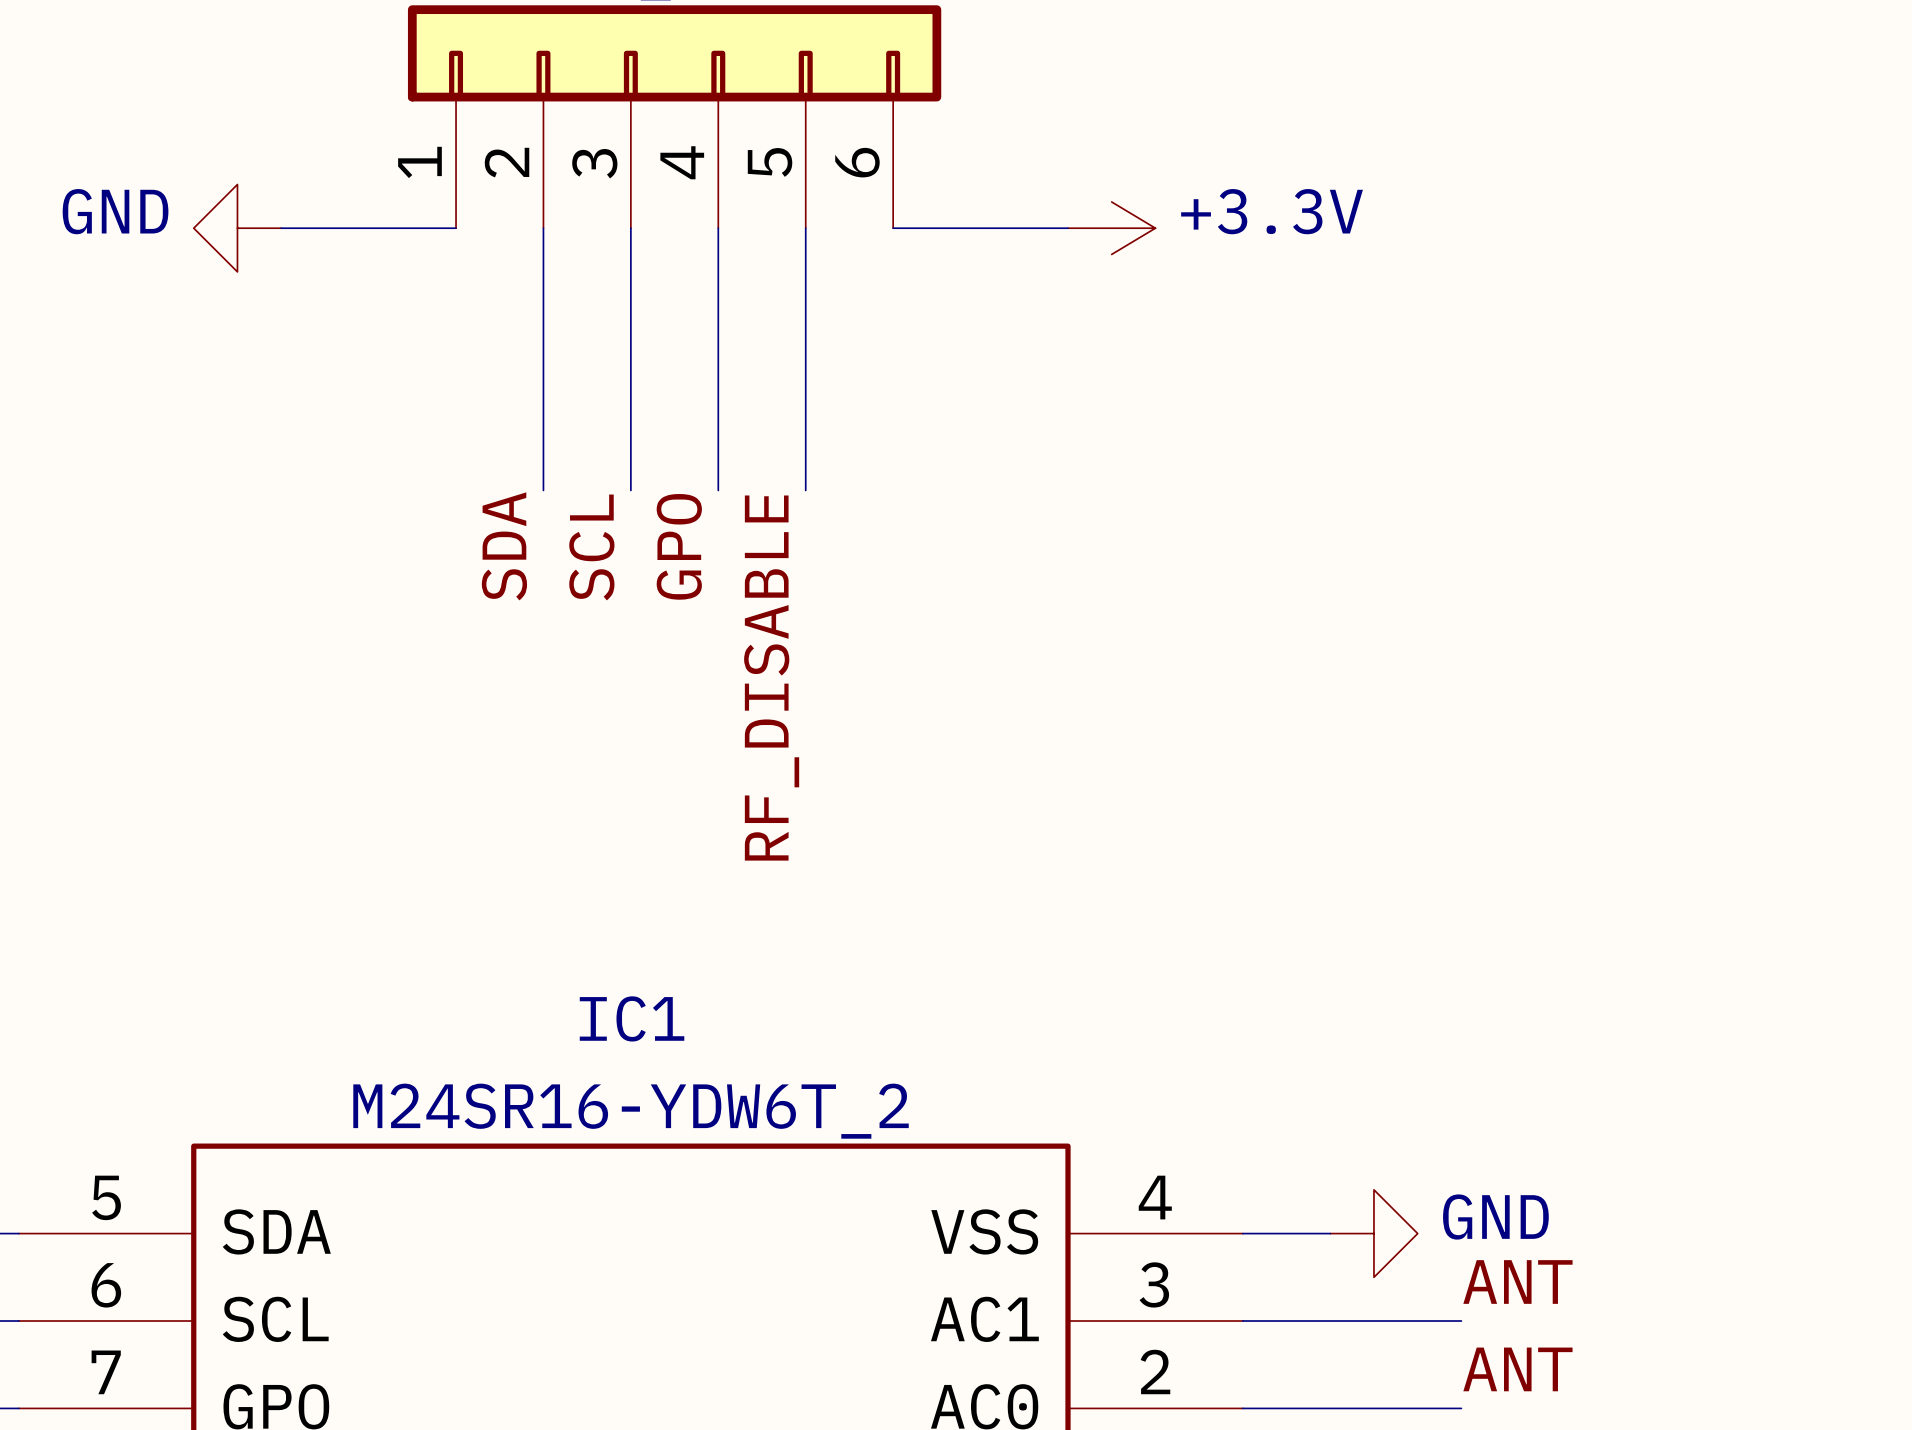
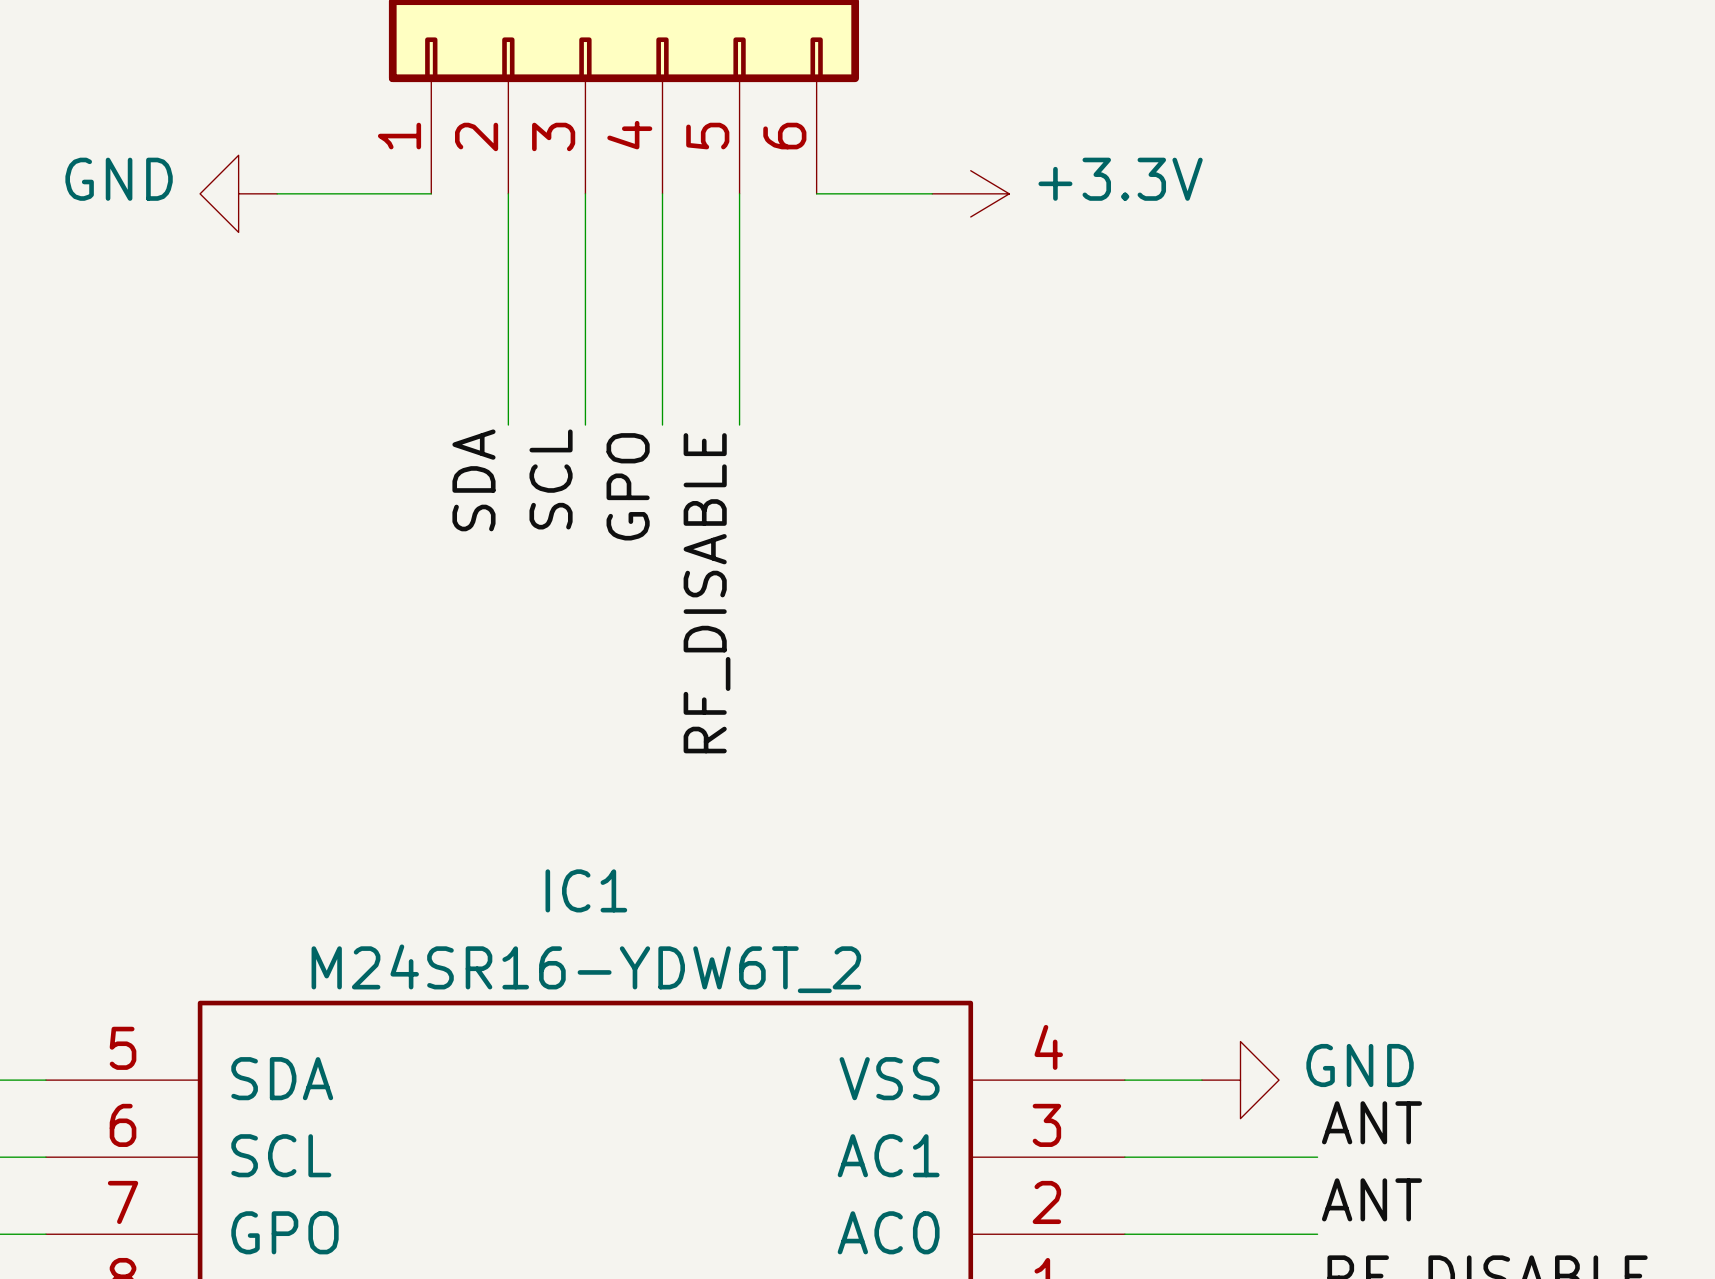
power symbol position: +3.3V (1111, 228) -> +3.3V (970, 193)

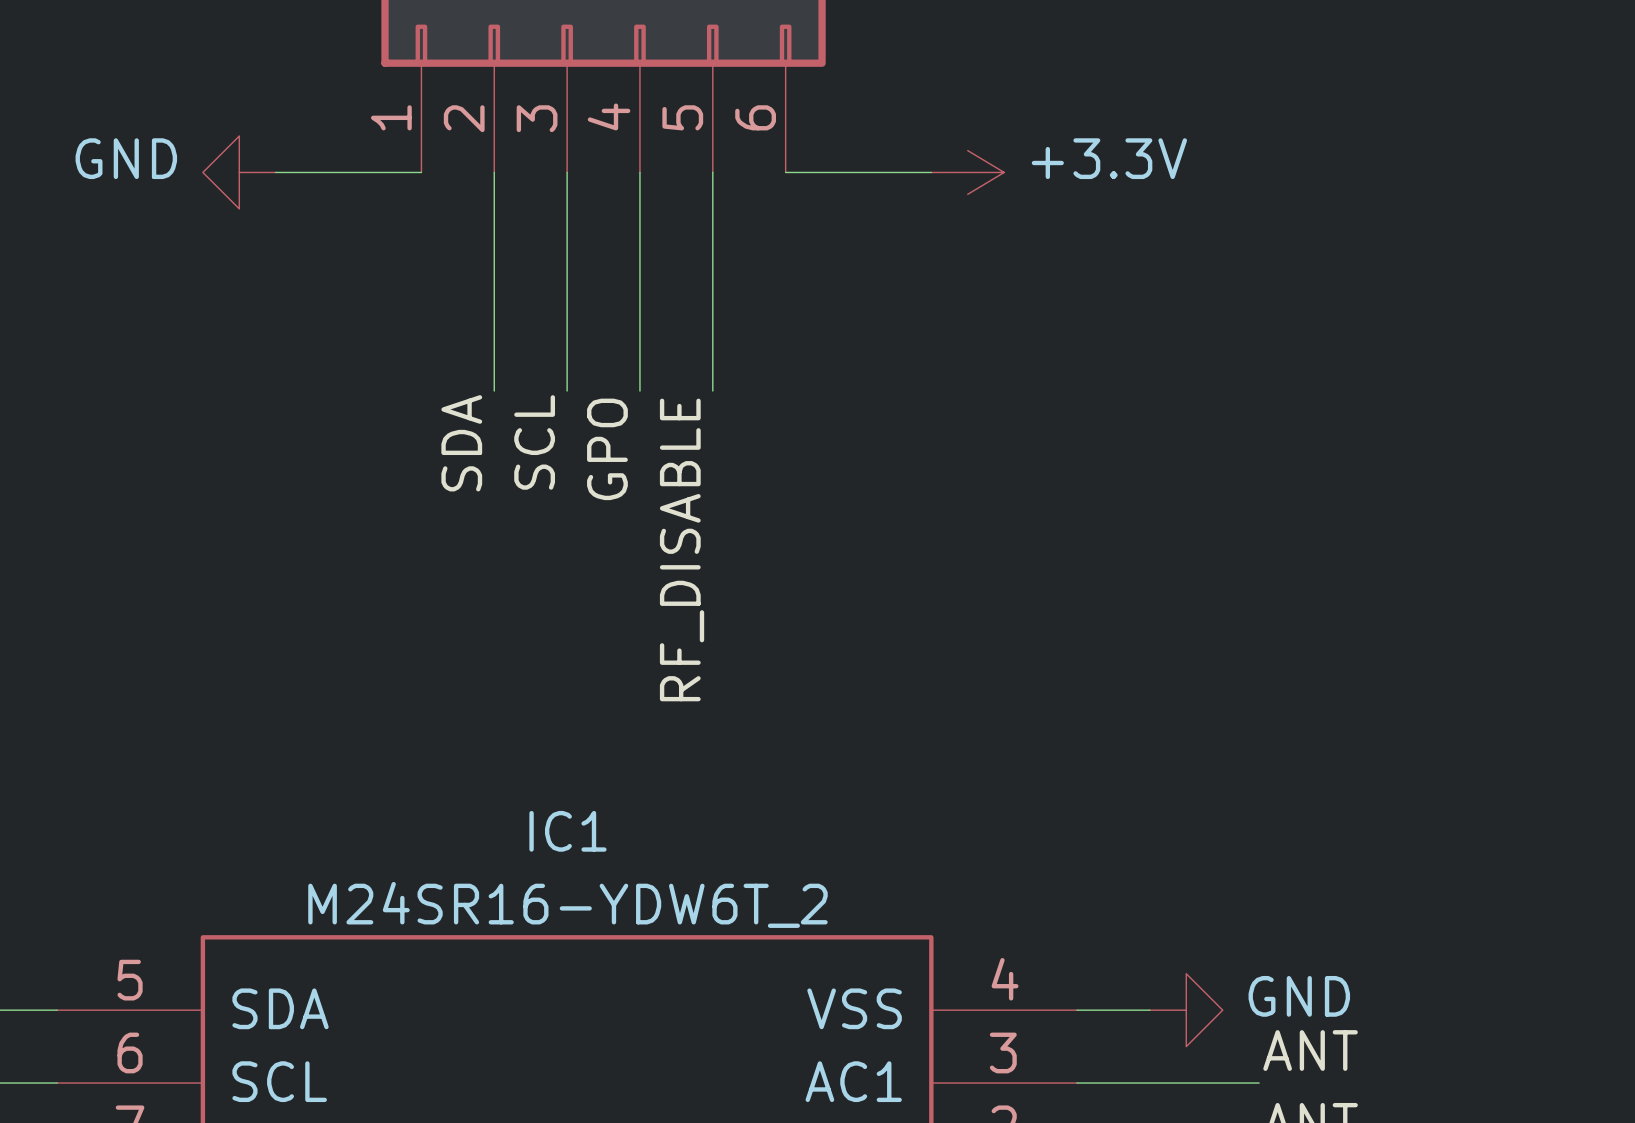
power symbol position: +3.3V (970, 193) -> +3.3V (967, 172)

